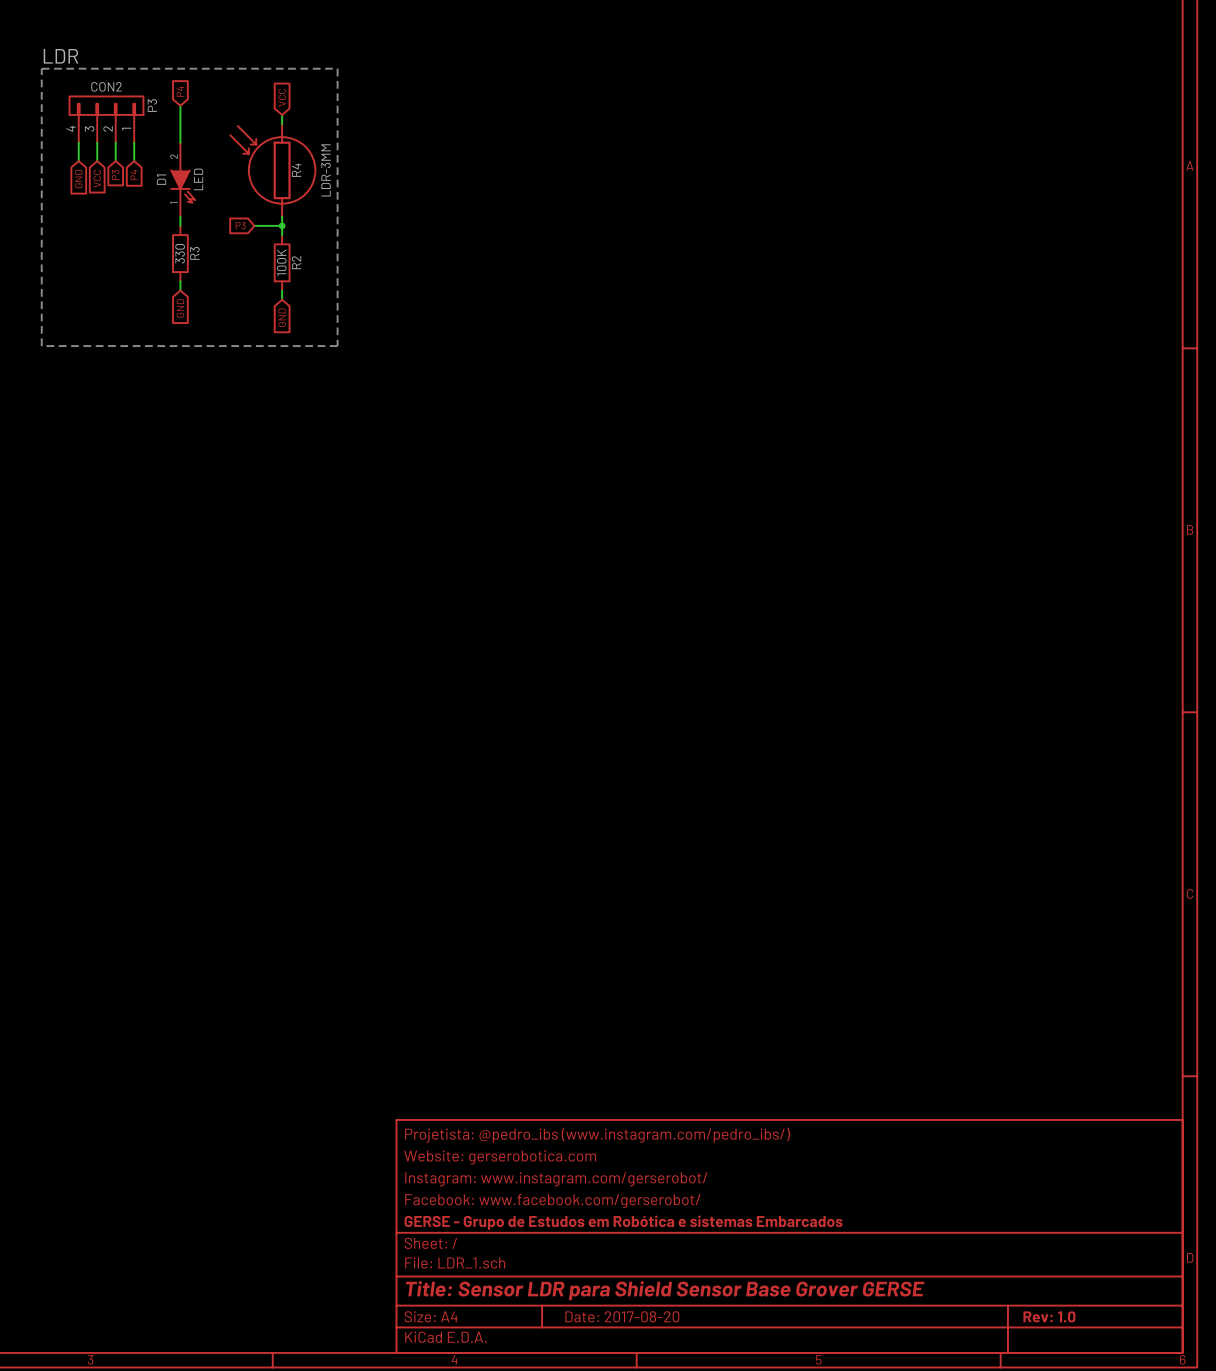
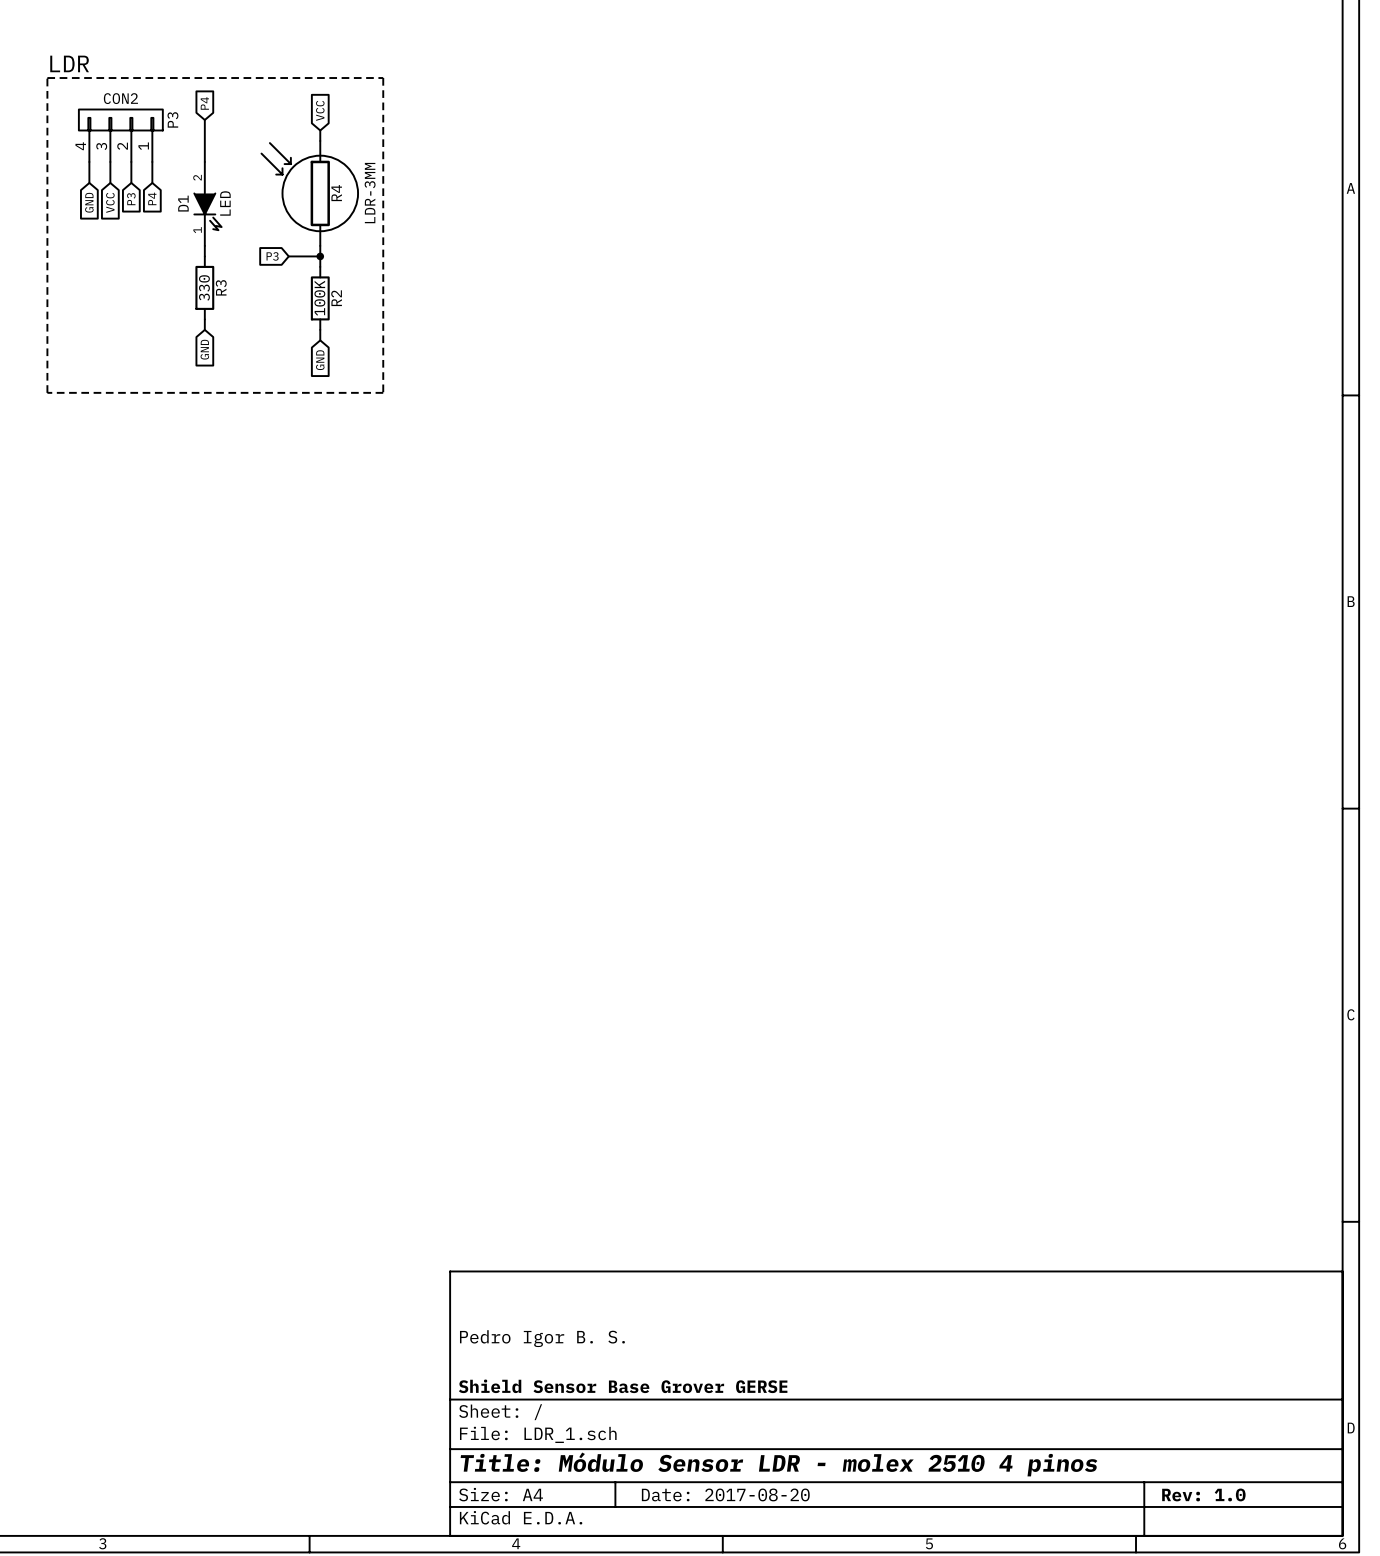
title block: Projetista: @pedro_ibs (www.instagram.com/pedro_ibs/) (597, 1135) -> none
title block: Website: gerserobotica.com (500, 1157) -> none
title block: Instagram: www.instagram.com/gerserobot/ (556, 1179) -> Pedro Igor B. S. (542, 1338)
title block: Facebook: www.facebook.com/gerserobot/ (552, 1201) -> none
title block: GERSE - Grupo de Estudos em Robótica e sistemas Embarcados (623, 1222) -> Shield Sensor Base Grover GERSE (623, 1386)
title block: Title: Sensor LDR para Shield Sensor Base Grover GERSE (665, 1290) -> Title: Módulo Sensor LDR - molex 2510 4 pinos (779, 1464)

